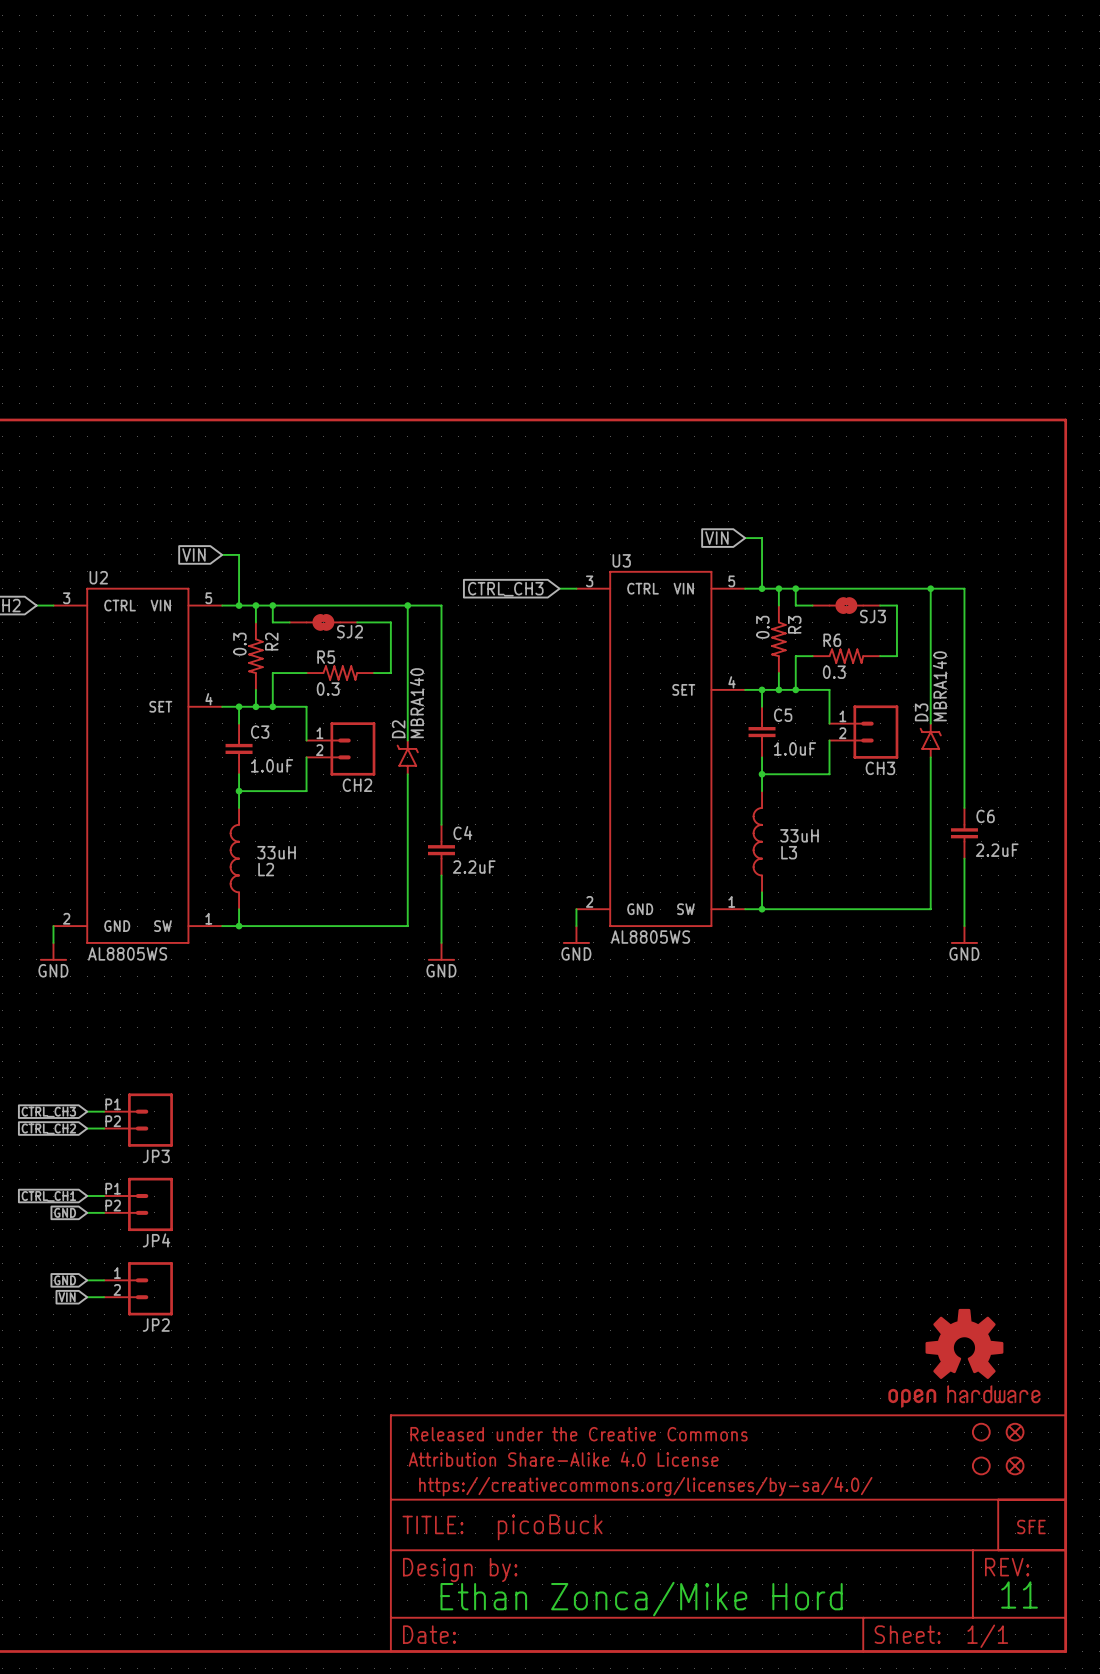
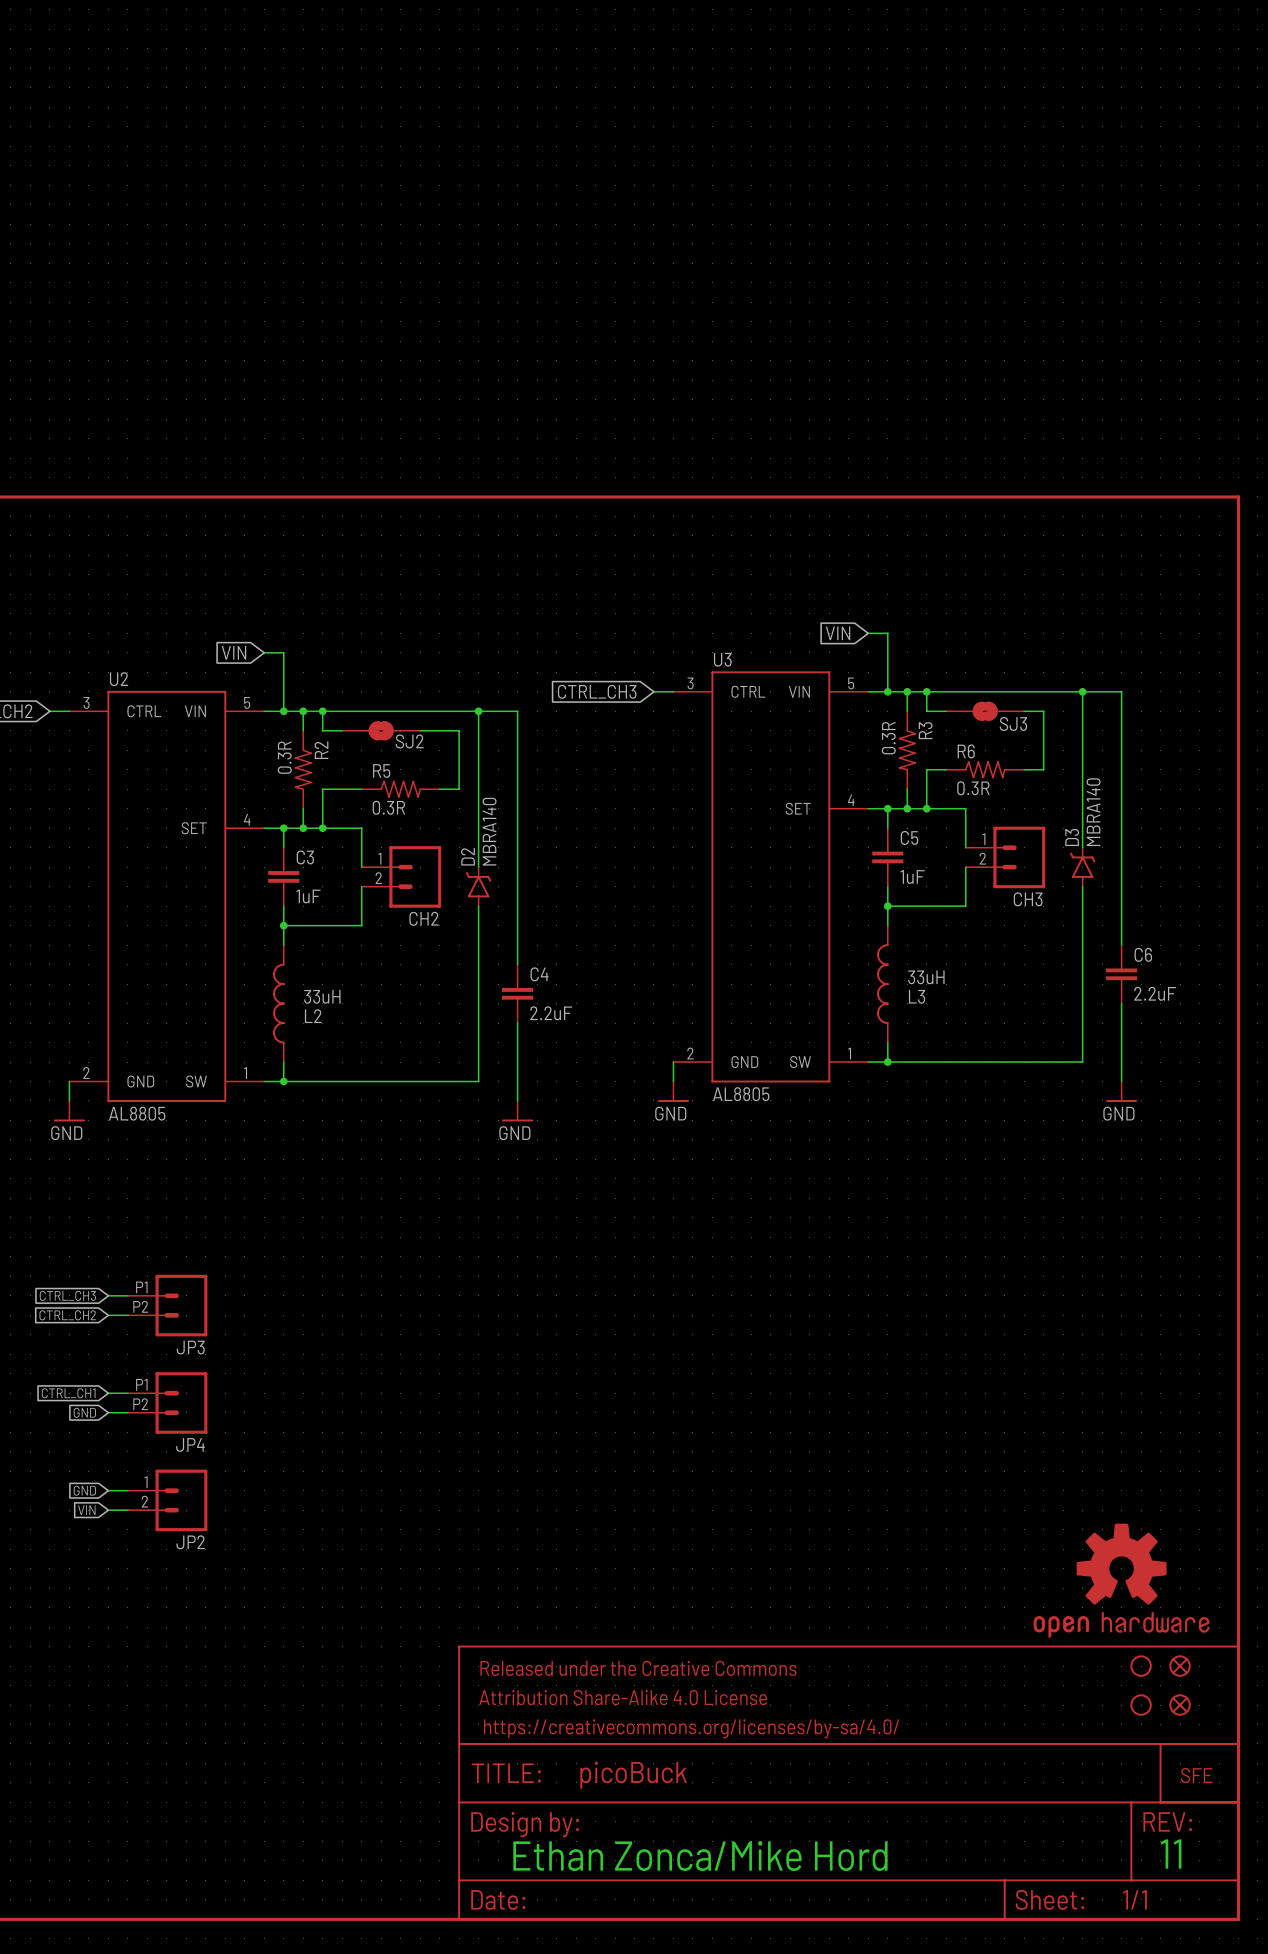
R3 value: 0.3 (762, 627) -> 0.3R (888, 738)
R2 value: 0.3 (239, 644) -> 0.3R (284, 757)
R6 value: 0.3 (834, 672) -> 0.3R (973, 788)
R5 value: 0.3 (328, 689) -> 0.3R (388, 807)
C5 value: 1.0uF (795, 748) -> 1uF (912, 876)
C3 value: 1.0uF (272, 765) -> 1uF (308, 896)
U3 value: AL8805WS (650, 937) -> AL8805 (741, 1094)
U2 value: AL8805WS (127, 953) -> AL8805 (137, 1113)

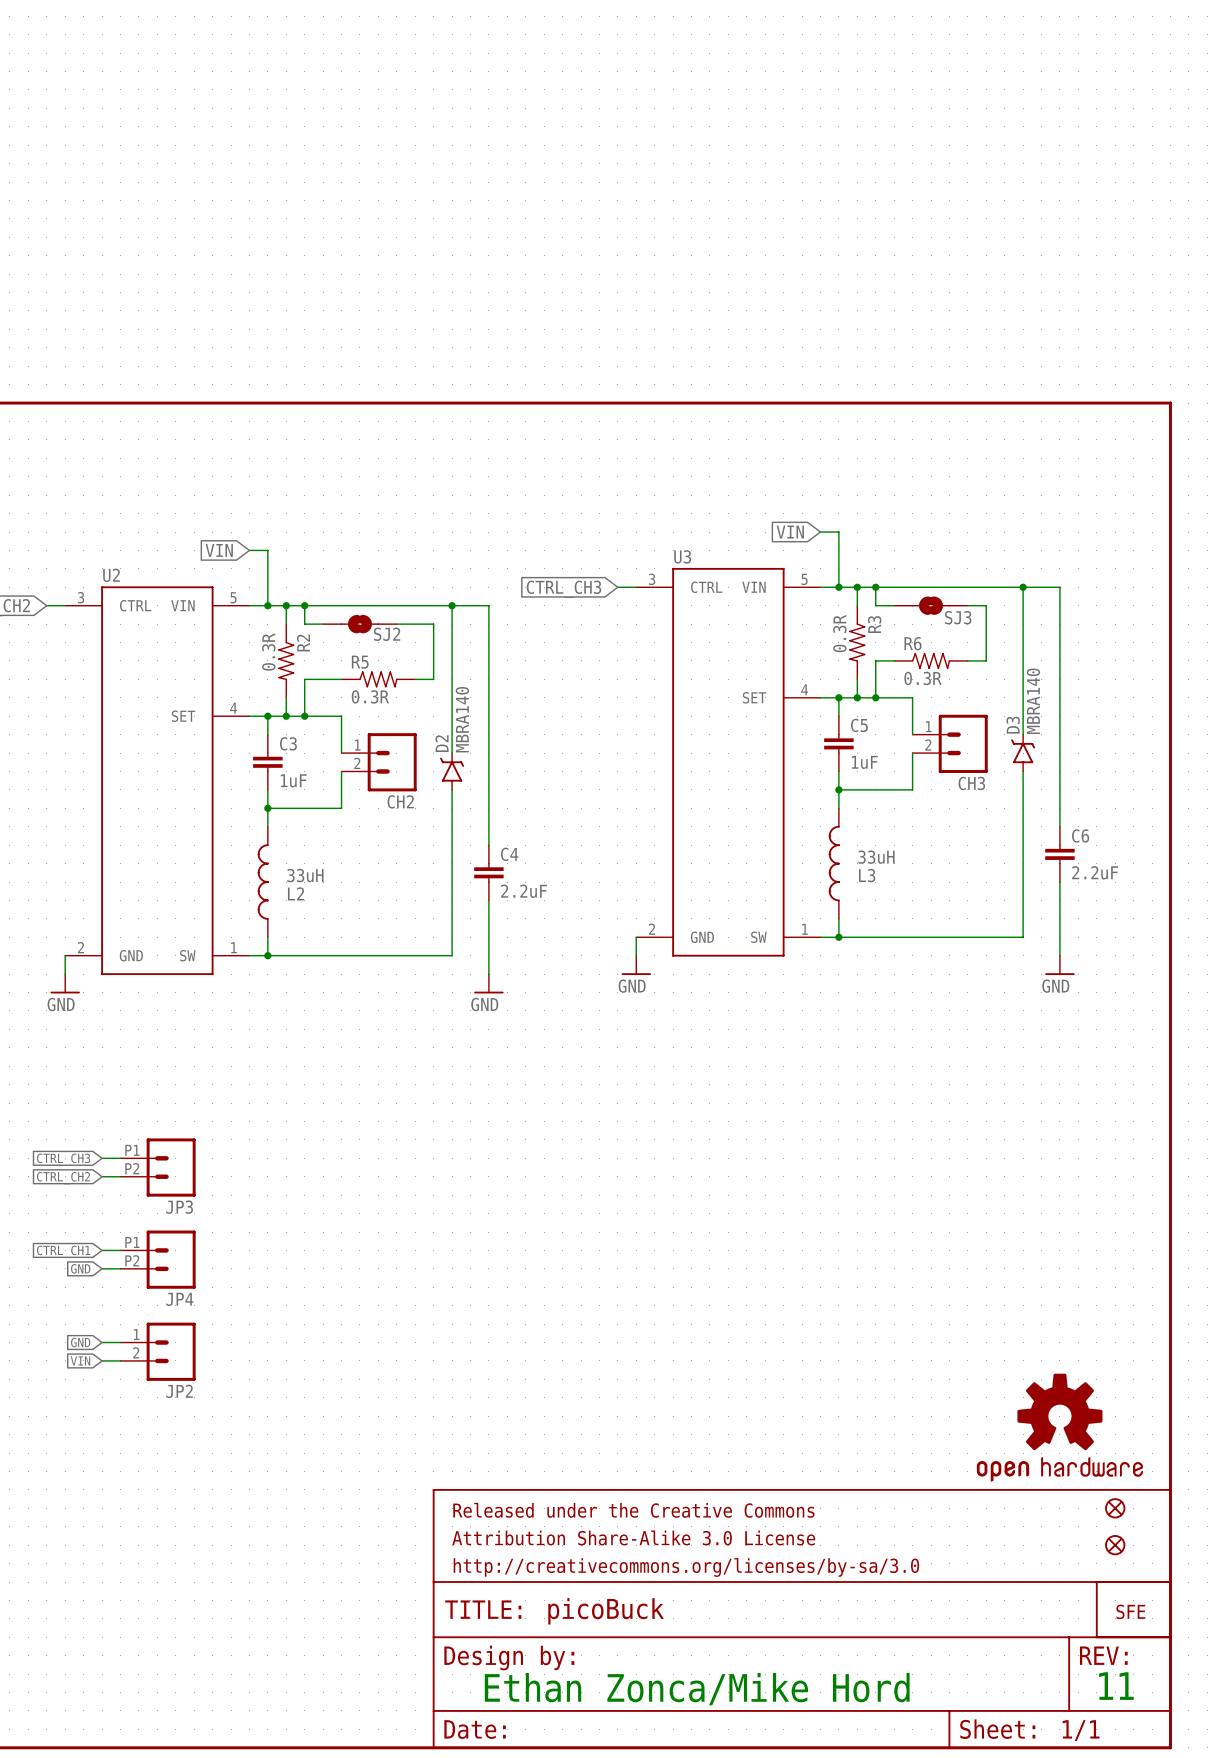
U3 value: AL8805 (741, 1094) -> none
U2 value: AL8805 (137, 1113) -> none
part: (1141, 1666) -> none
part text: Attribution Share-Alike 4.0 License (623, 1697) -> Attribution Share-Alike 3.0 License (633, 1537)
part: (1141, 1705) -> none
part text: https://creativecommons.org/licenses/by-sa/4.0/ (691, 1728) -> http://creativecommons.org/licenses/by-sa/3.0 (686, 1567)

